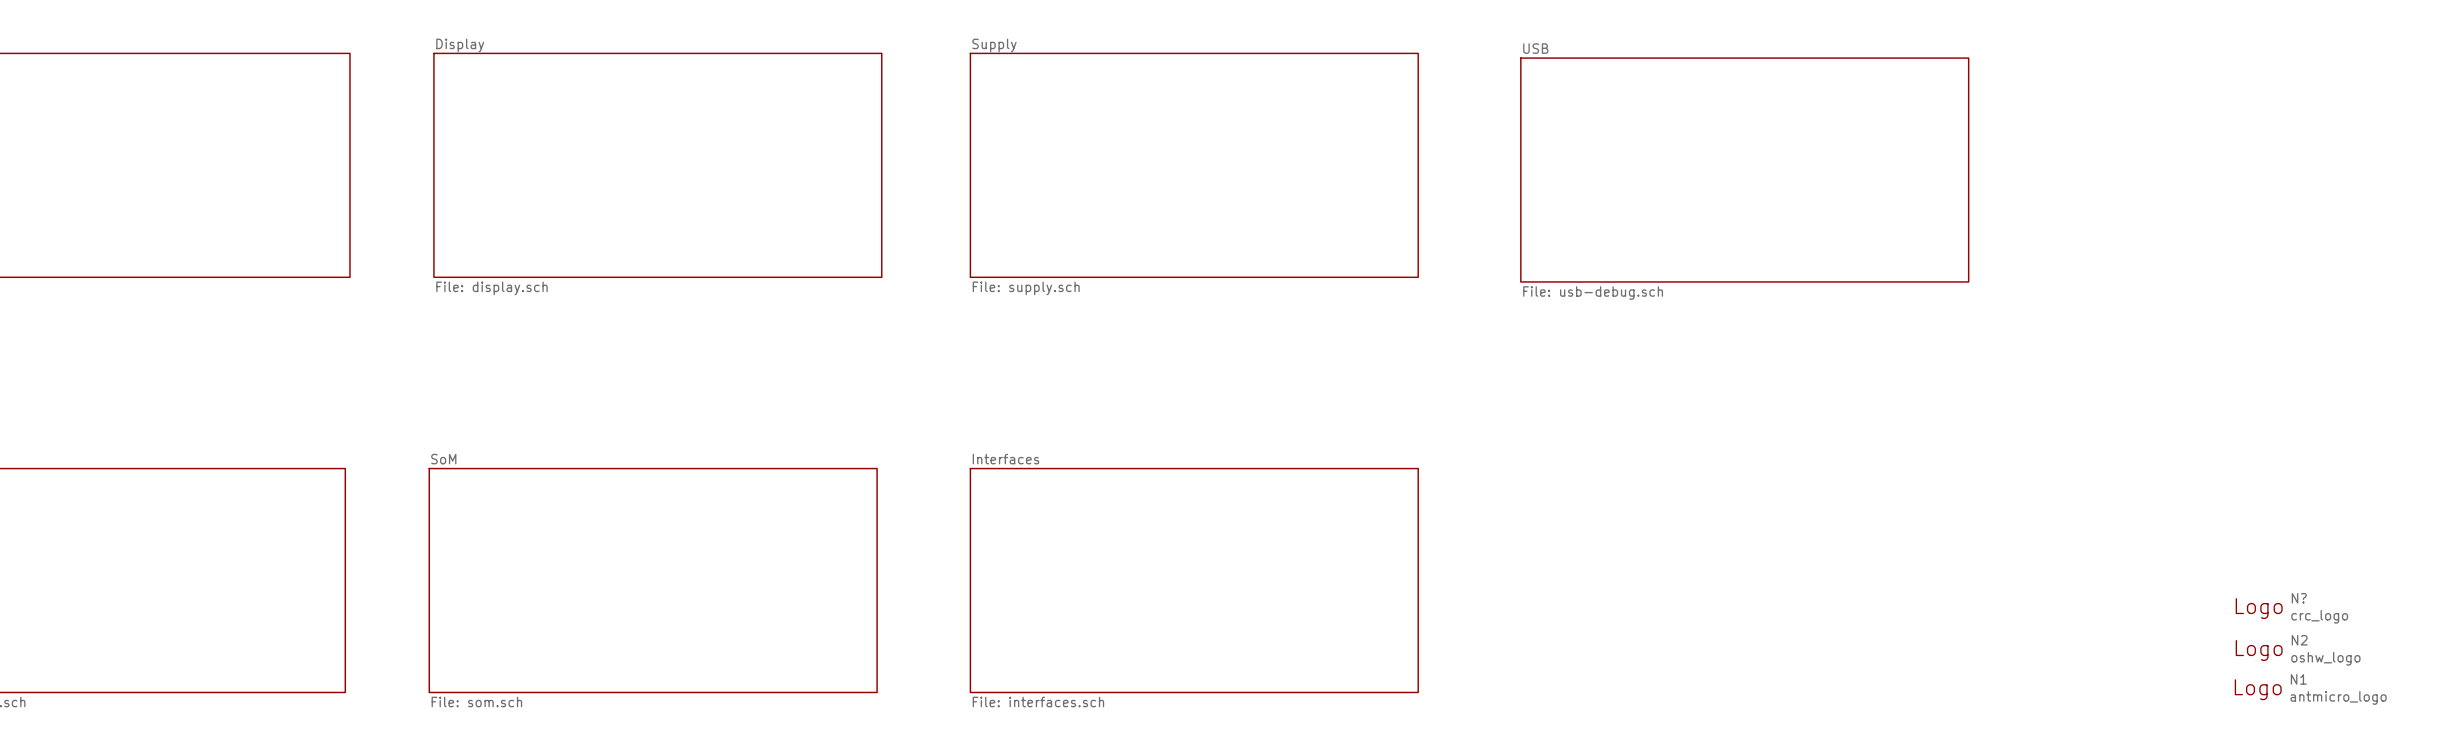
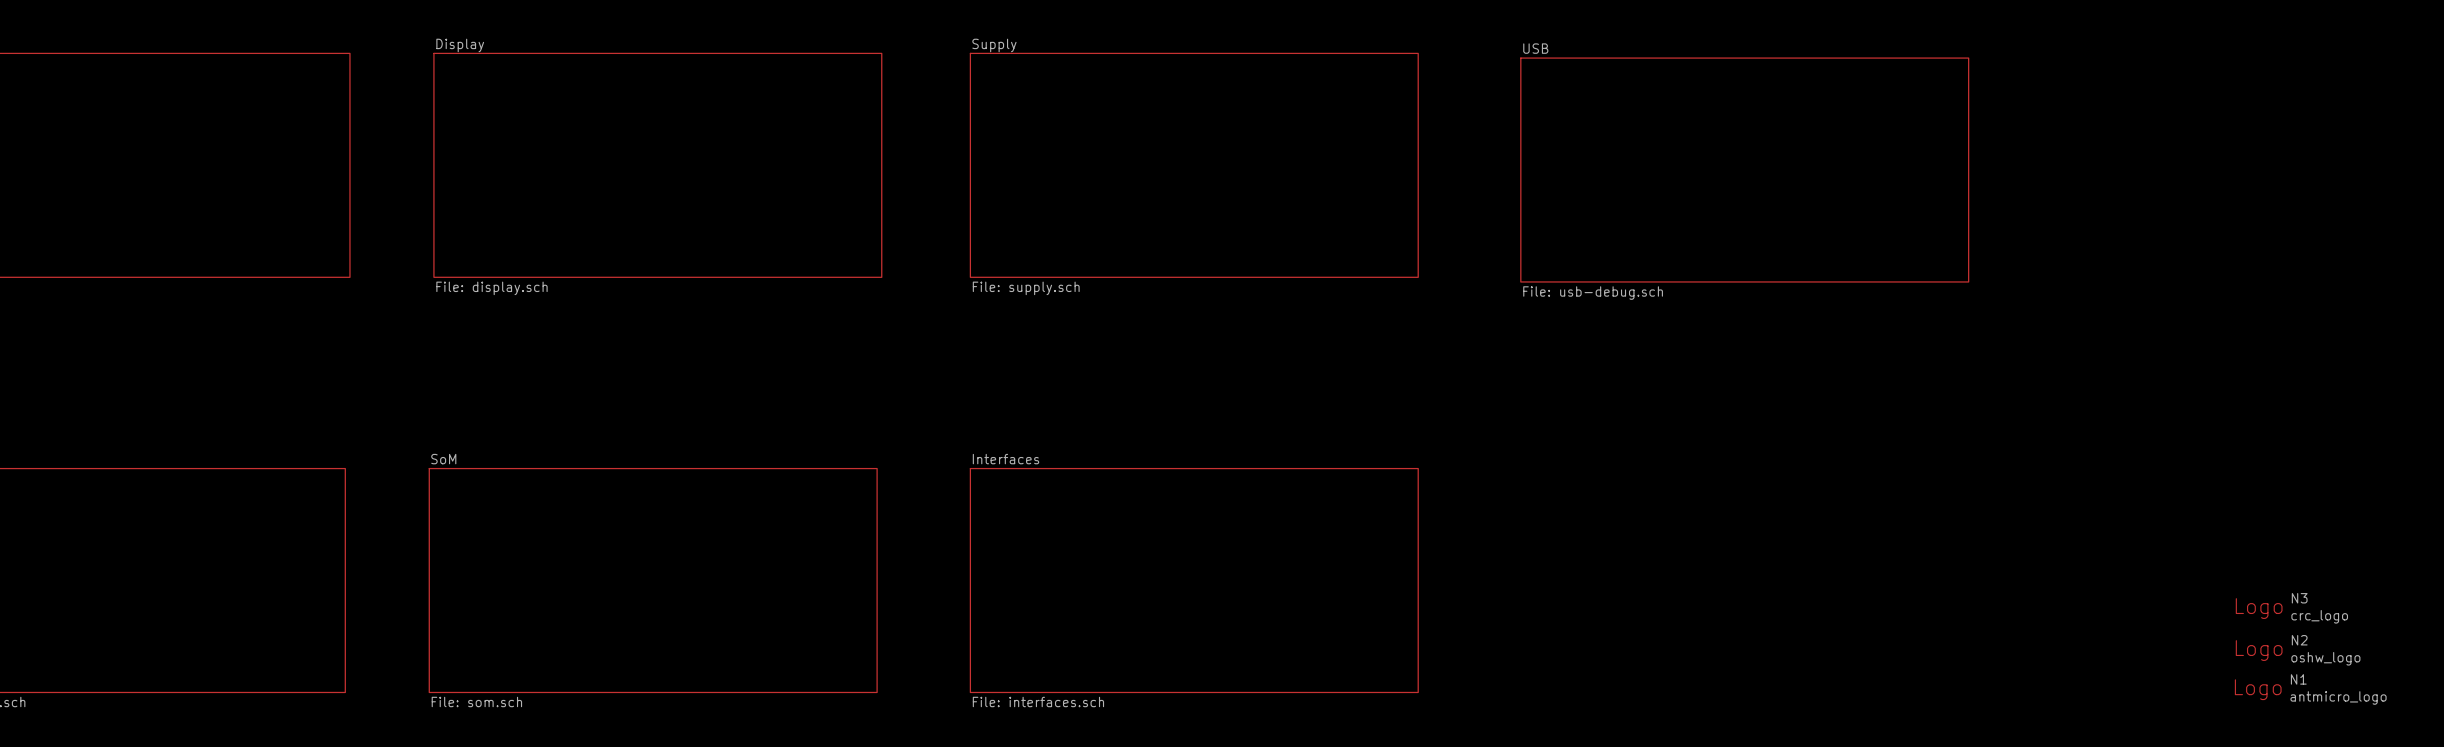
N? name: N? (2299, 598) -> N3 (2299, 598)

